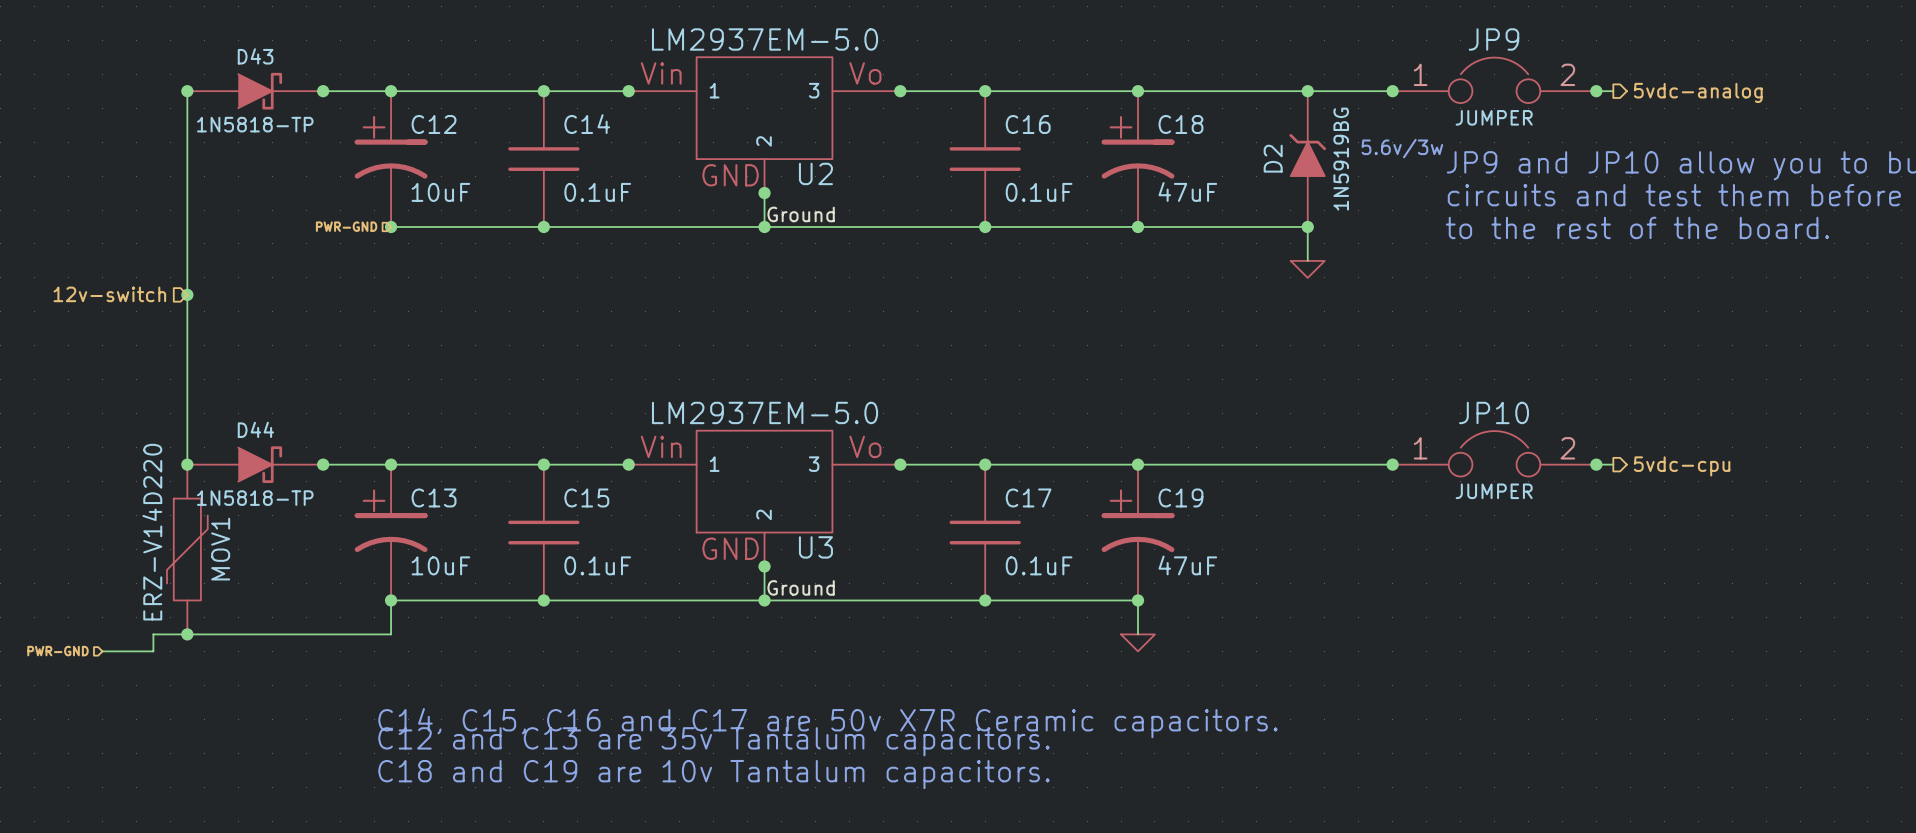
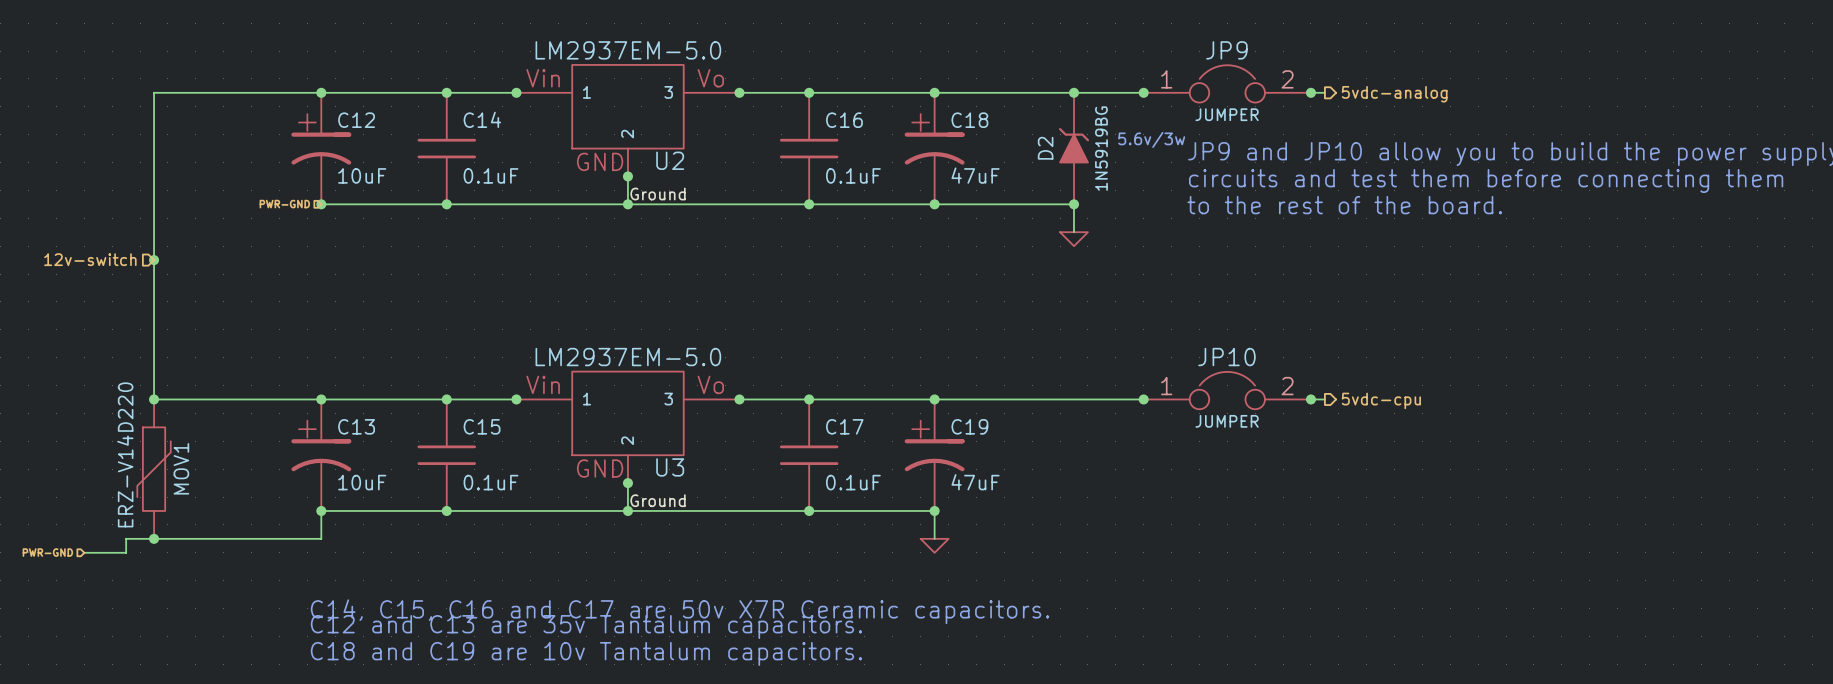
junction: (187, 91) -> none
D43: 1N5818-TP (255, 91) -> none
junction: (323, 91) -> none
D44: 1N5818-TP (255, 464) -> none
junction: (323, 464) -> none

